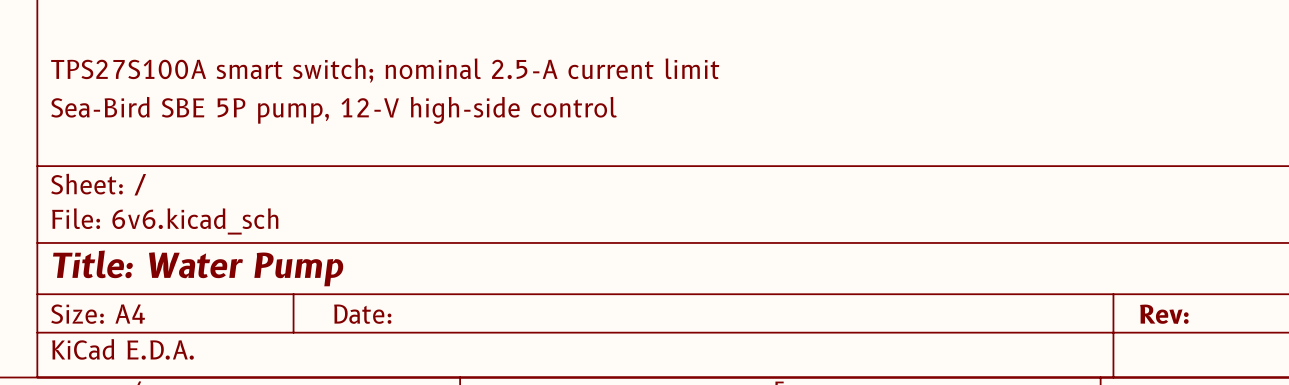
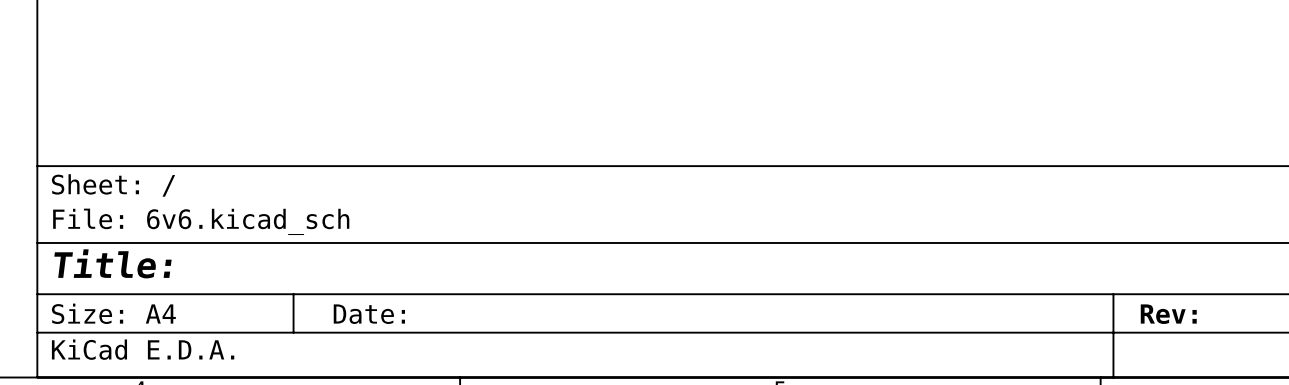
title block: TPS27S100A smart switch; nominal 2.5-A current limit (385, 70) -> none
title block: Sea-Bird SBE 5P pump, 12-V high-side control (333, 110) -> none
title block: Title: Water Pump (198, 268) -> Title: (112, 263)

